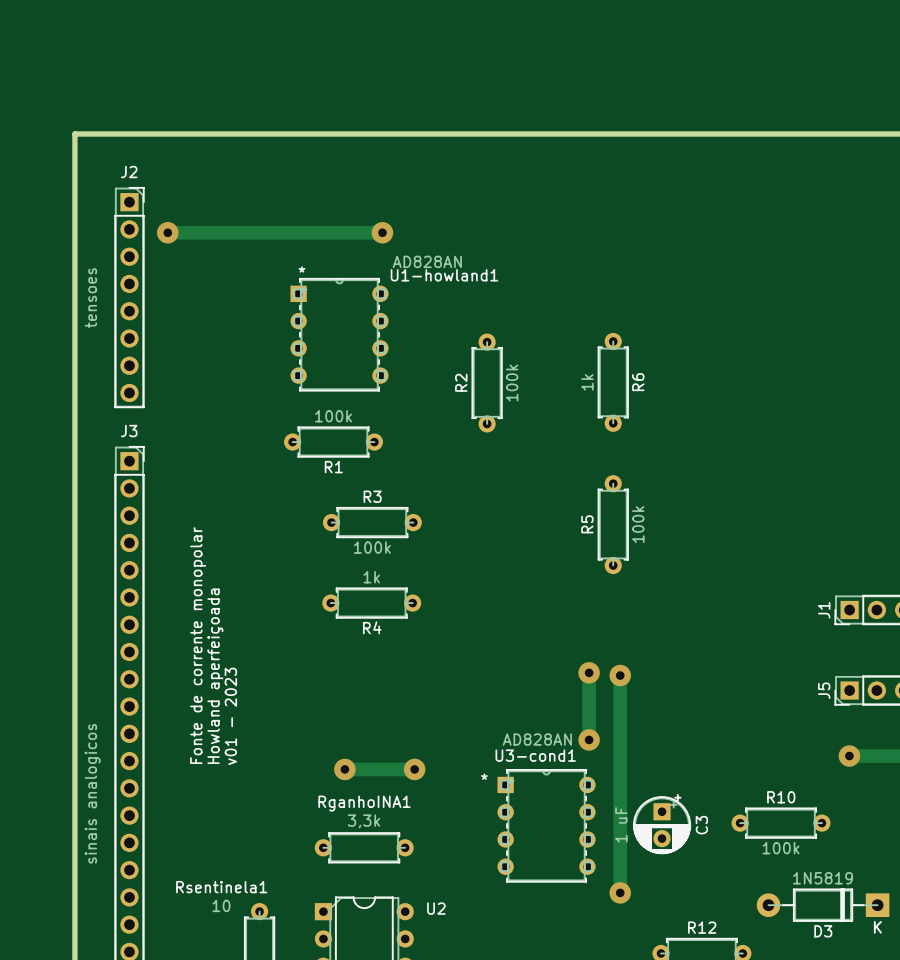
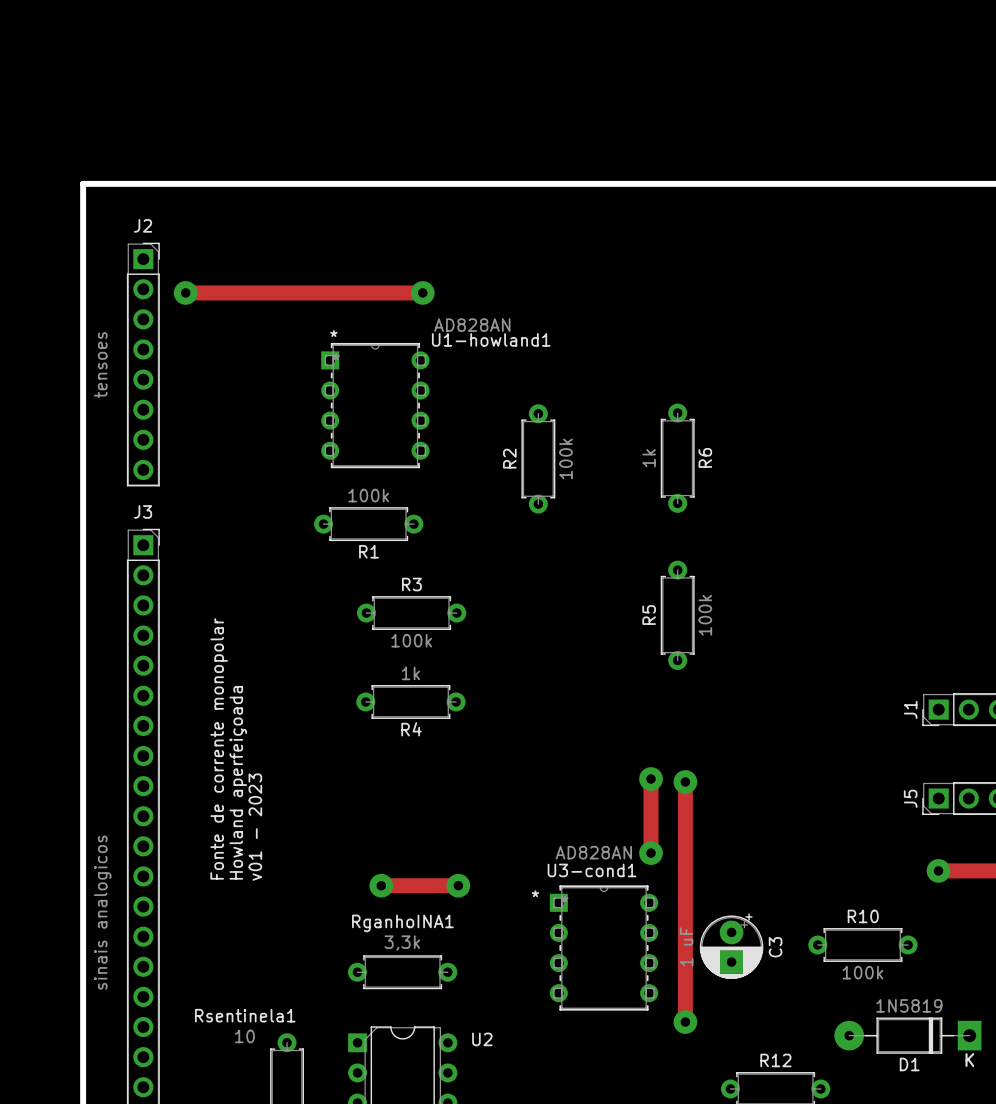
C3 footprint: [633, 794, 691, 854] -> [699, 913, 764, 980]
D1: none -> 1N5819 (907, 1035)
D3: 1N5819 (823, 905) -> none

